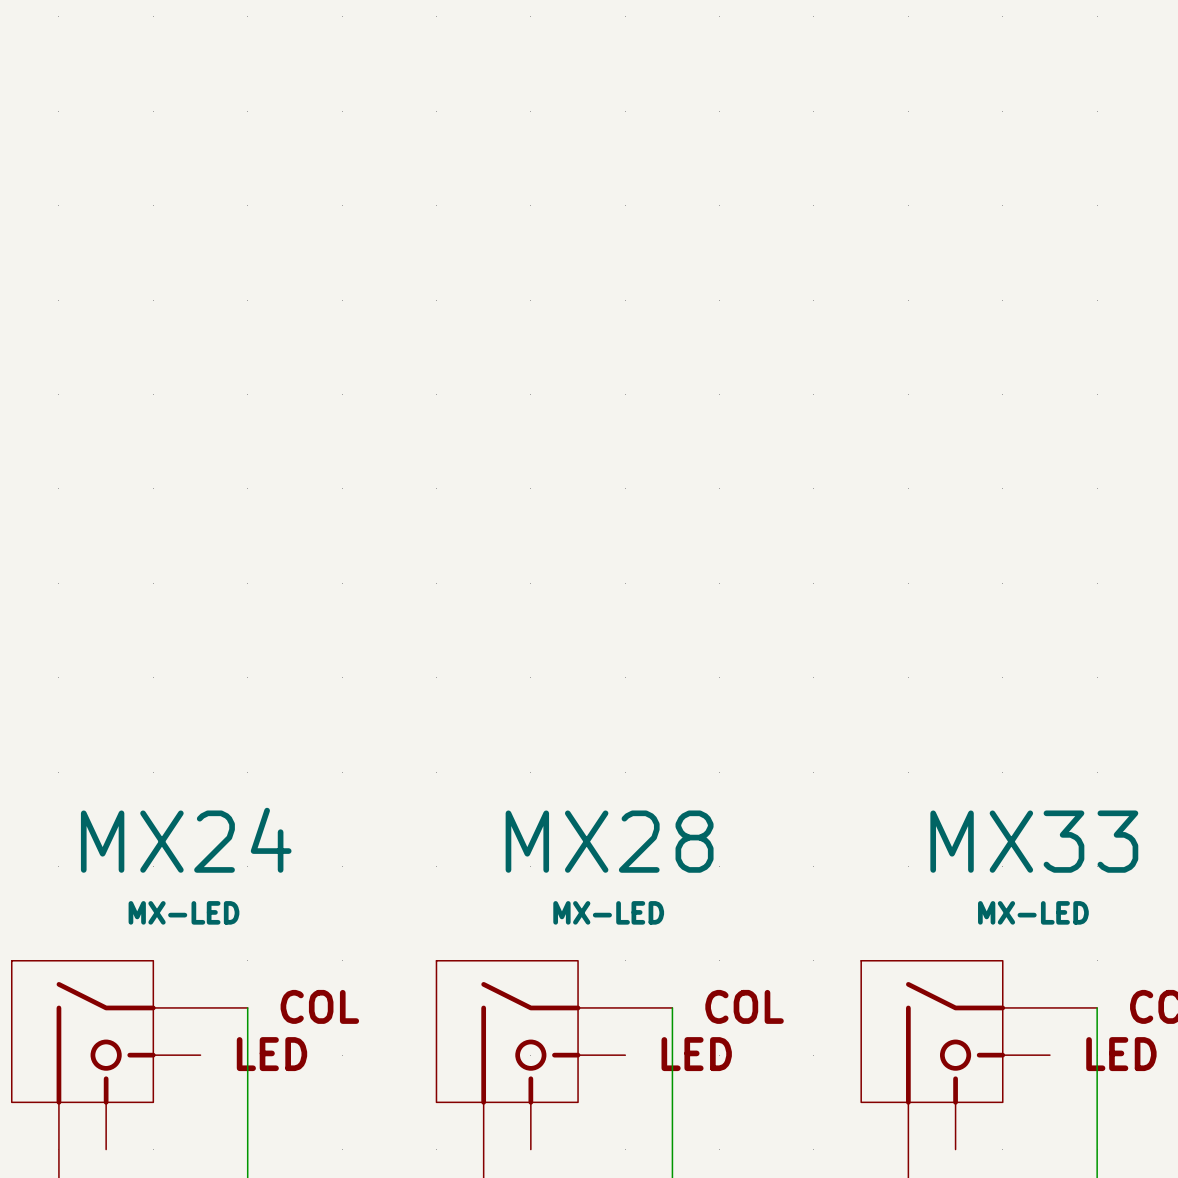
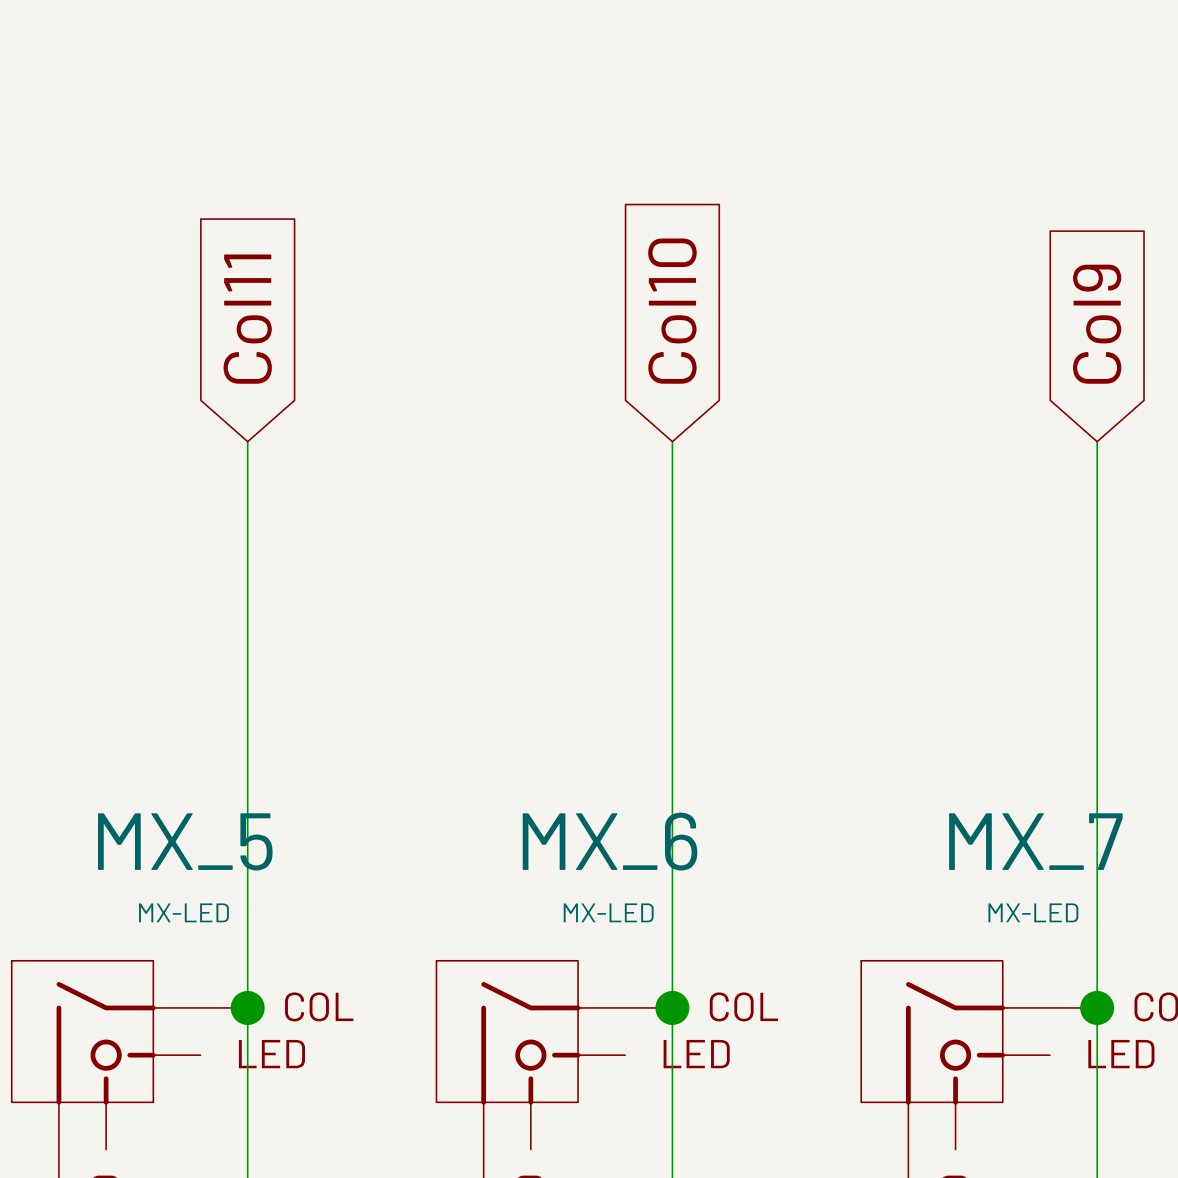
global label: none -> Col11 (247, 319)
global label: none -> Col10 (672, 311)
global label: none -> Col9 (1097, 324)
wire: none -> (247, 441) (247, 1007)
wire: none -> (672, 441) (672, 1007)
wire: none -> (1097, 441) (1097, 1007)
MX24 name: MX24 (186, 840) -> MX_5 (185, 841)
MX28 name: MX28 (609, 841) -> MX_6 (610, 841)
MX33 name: MX33 (1034, 841) -> MX_7 (1035, 841)
junction: none -> (247, 1007)
junction: none -> (672, 1007)
junction: none -> (1097, 1007)

